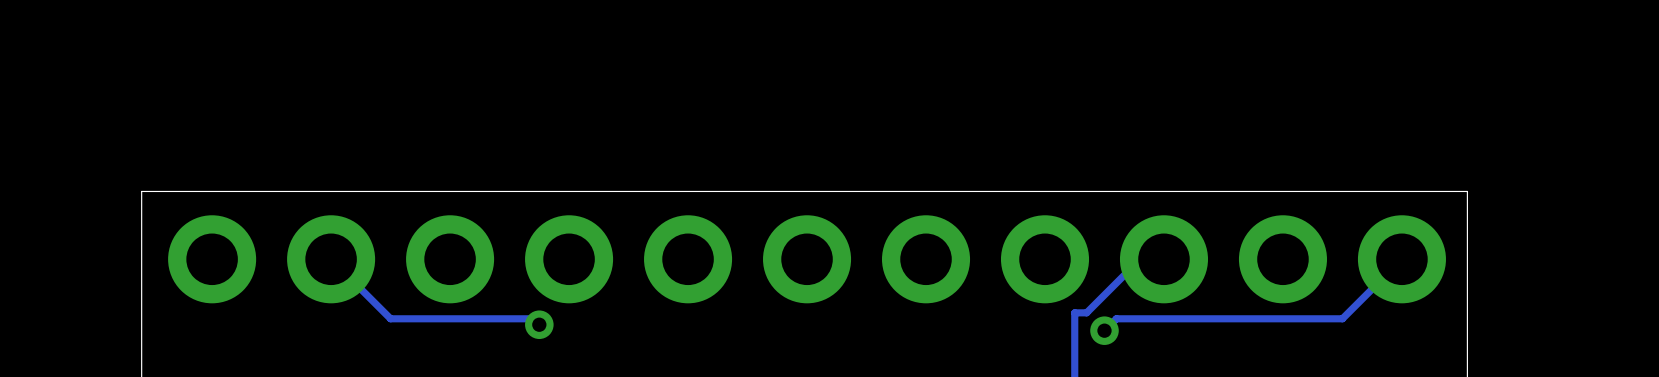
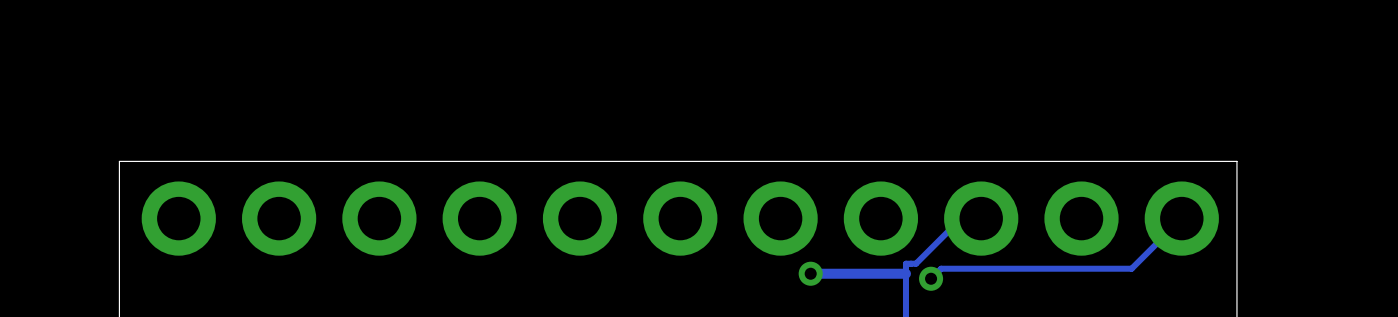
track: (331, 259) (390, 318) (533, 318) (539, 324) -> none
via: (539, 324) -> none
via: none -> (810, 273)
track: none -> (905, 273) (810, 273)

